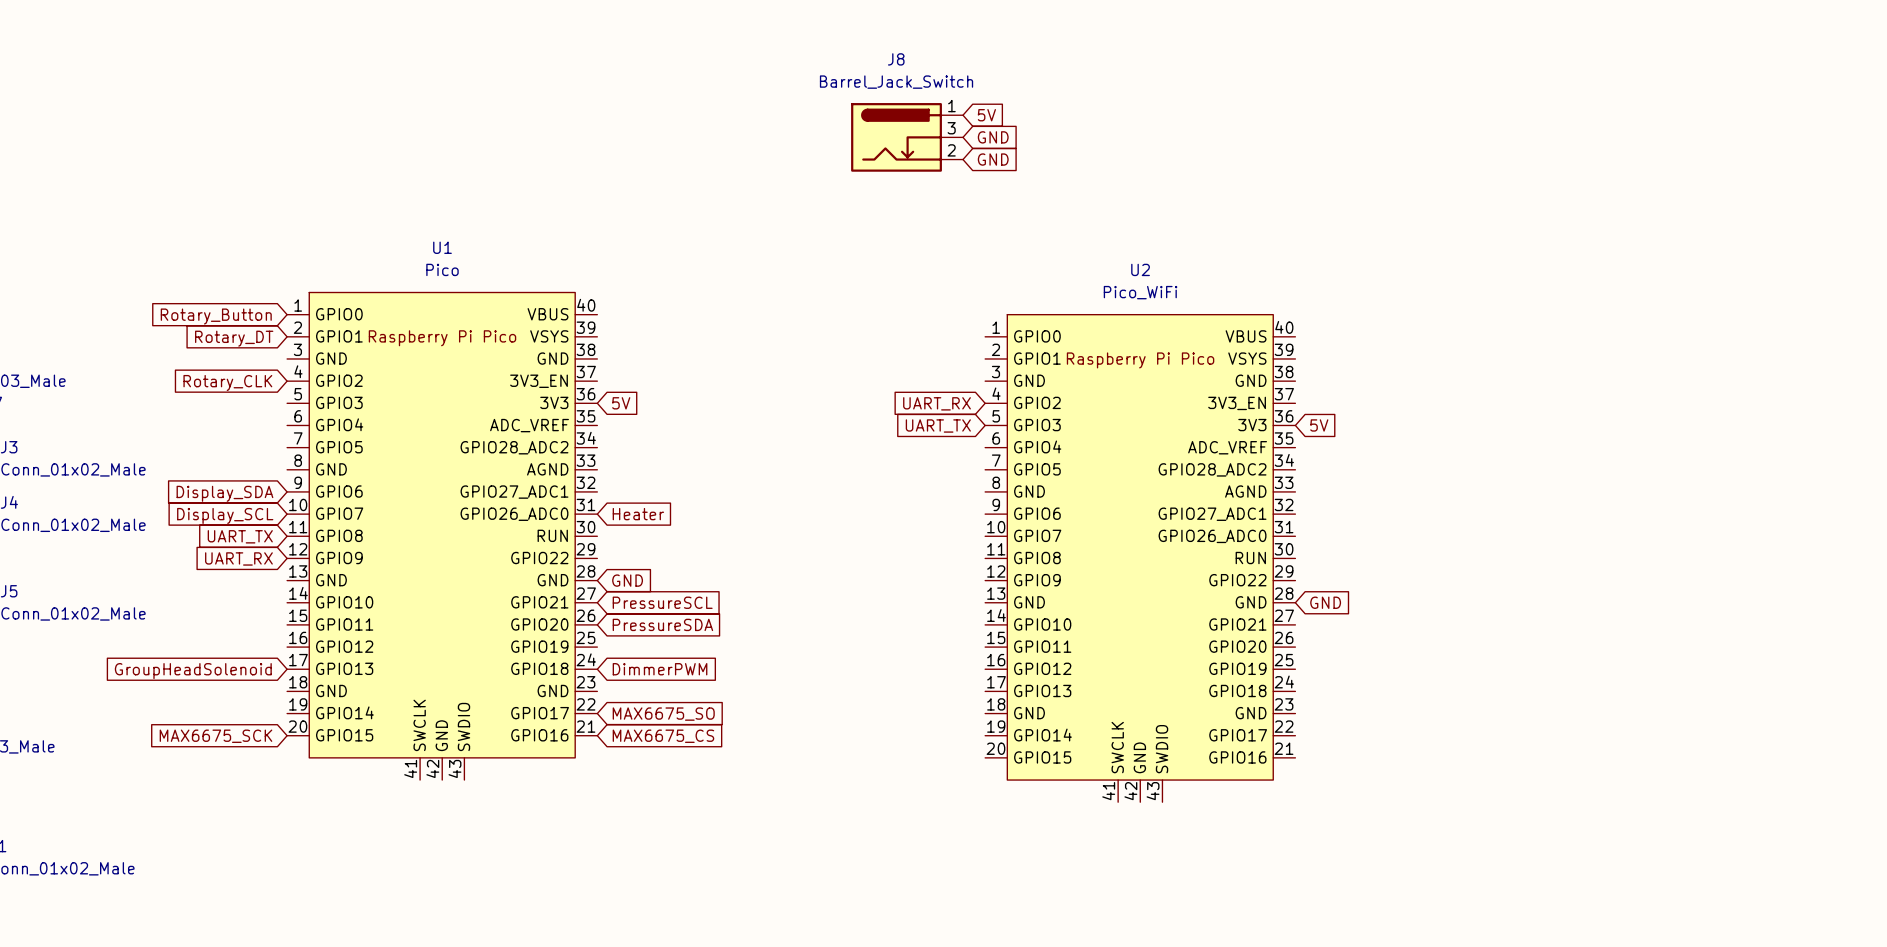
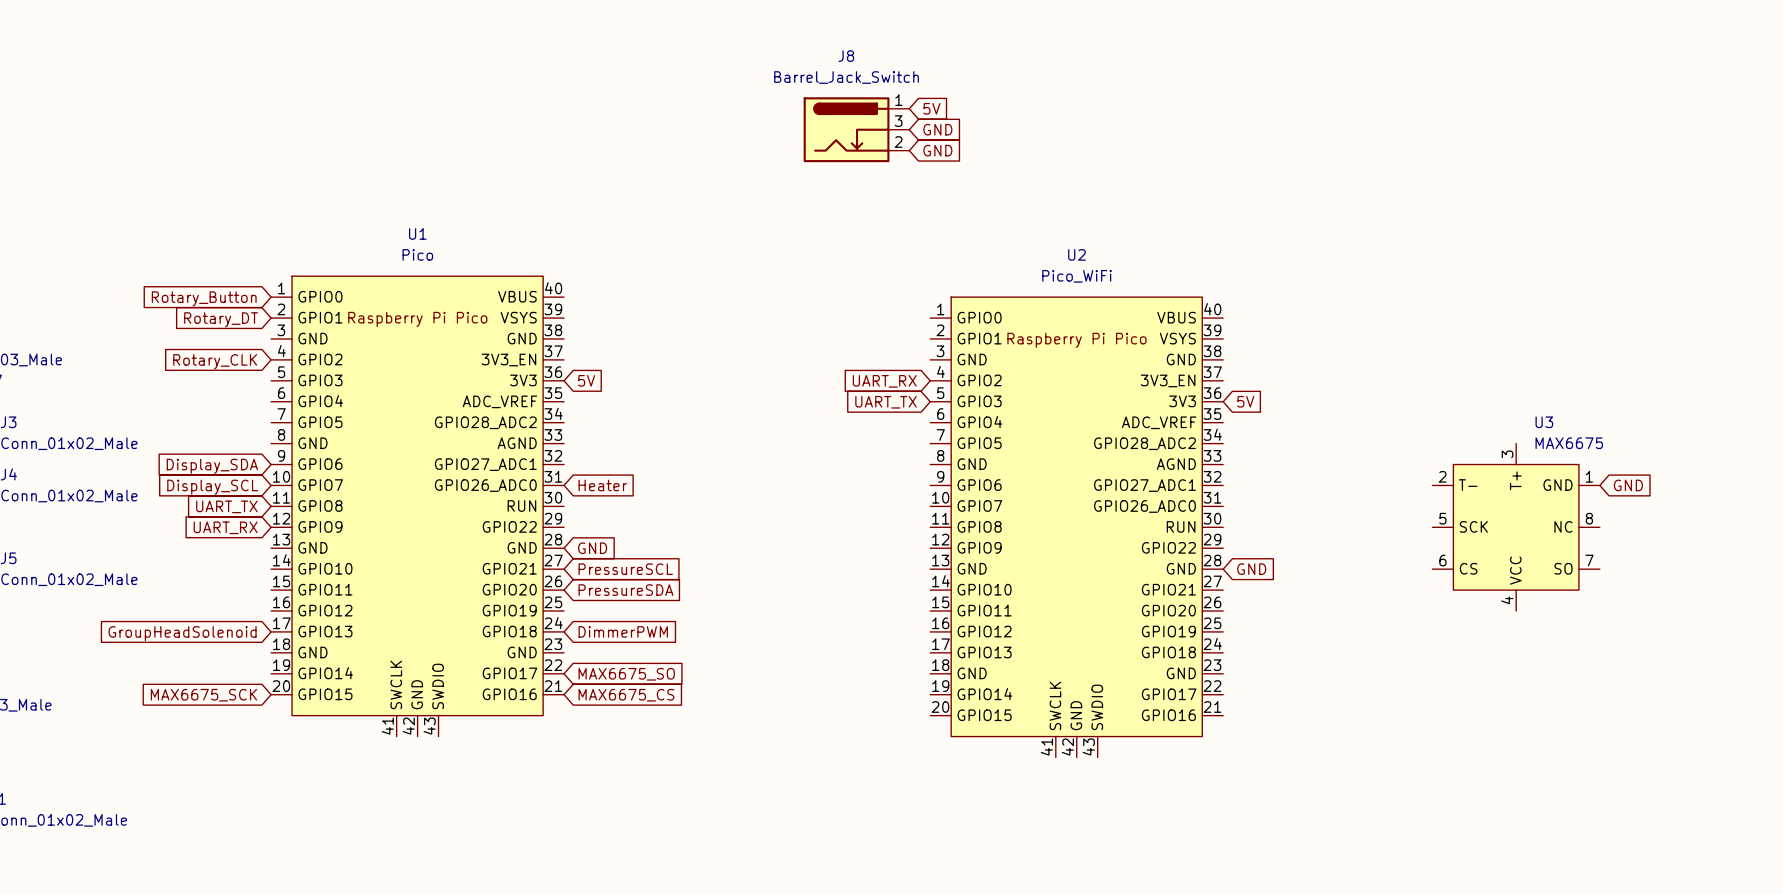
global label: none -> GND (1628, 485)
U3: none -> MAX6675 (1516, 527)

